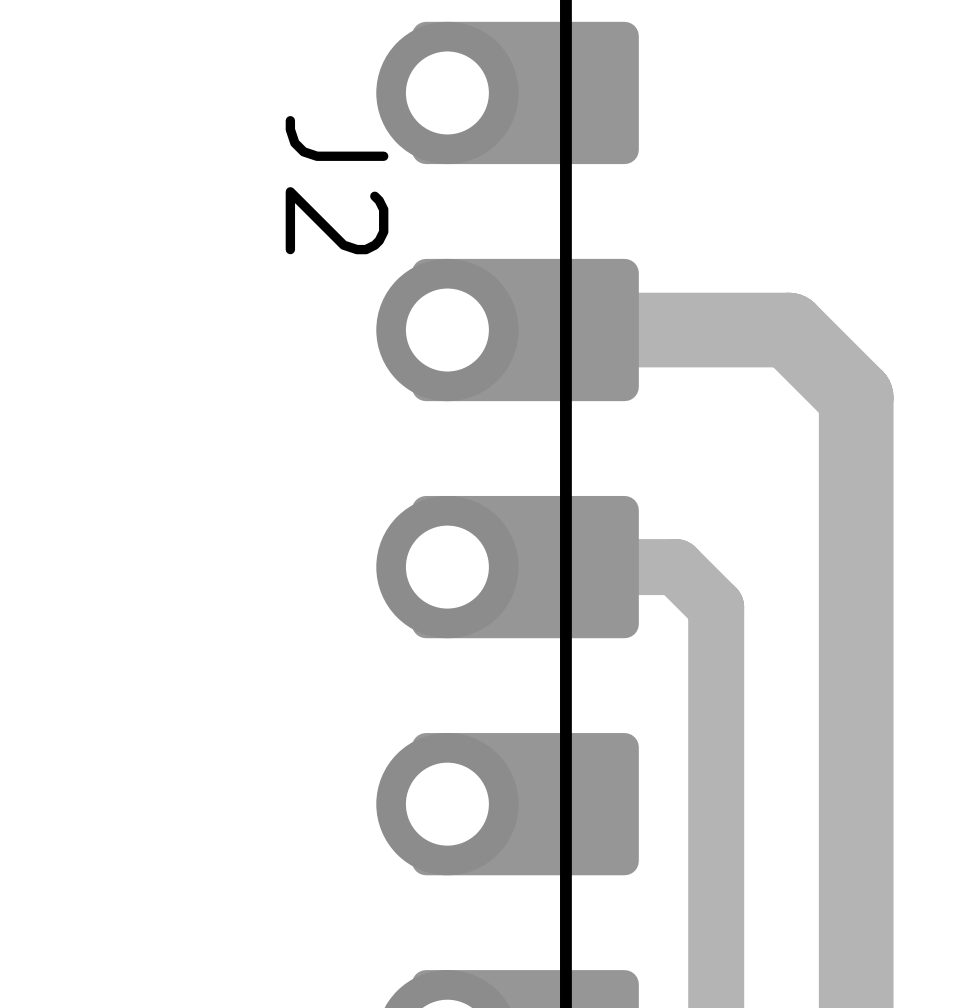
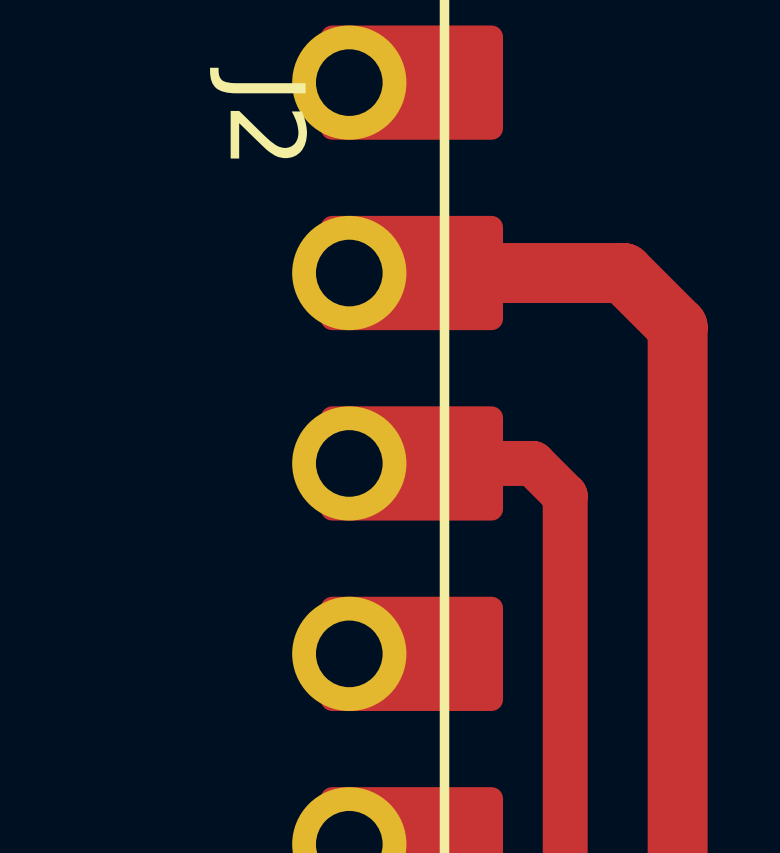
J2 name position: J2 (337, 185) -> J2 (258, 113)

